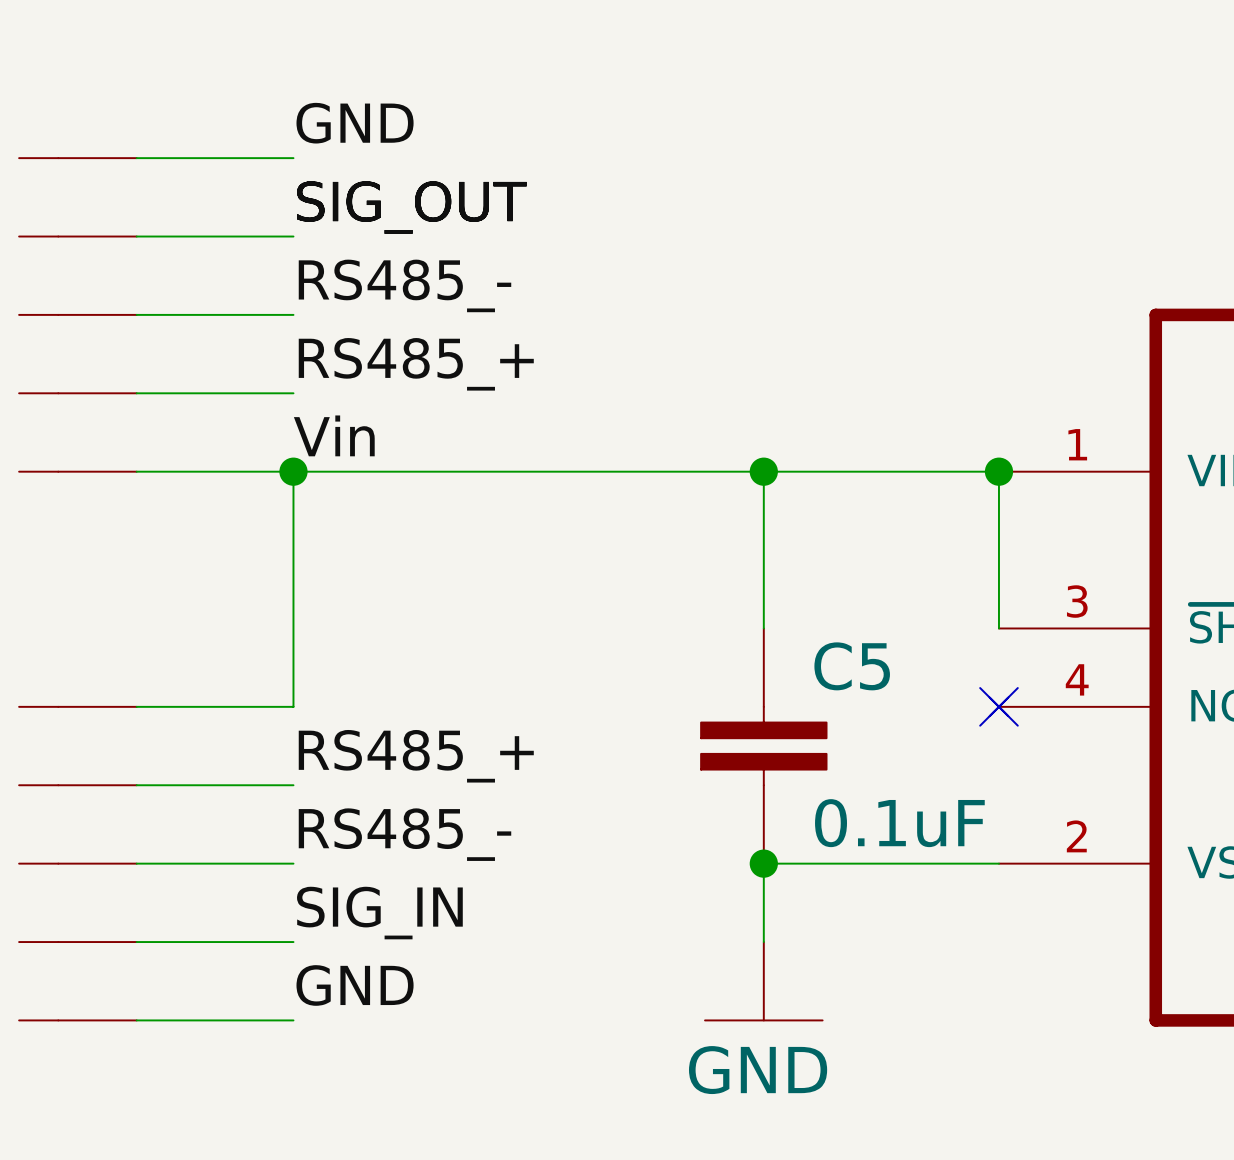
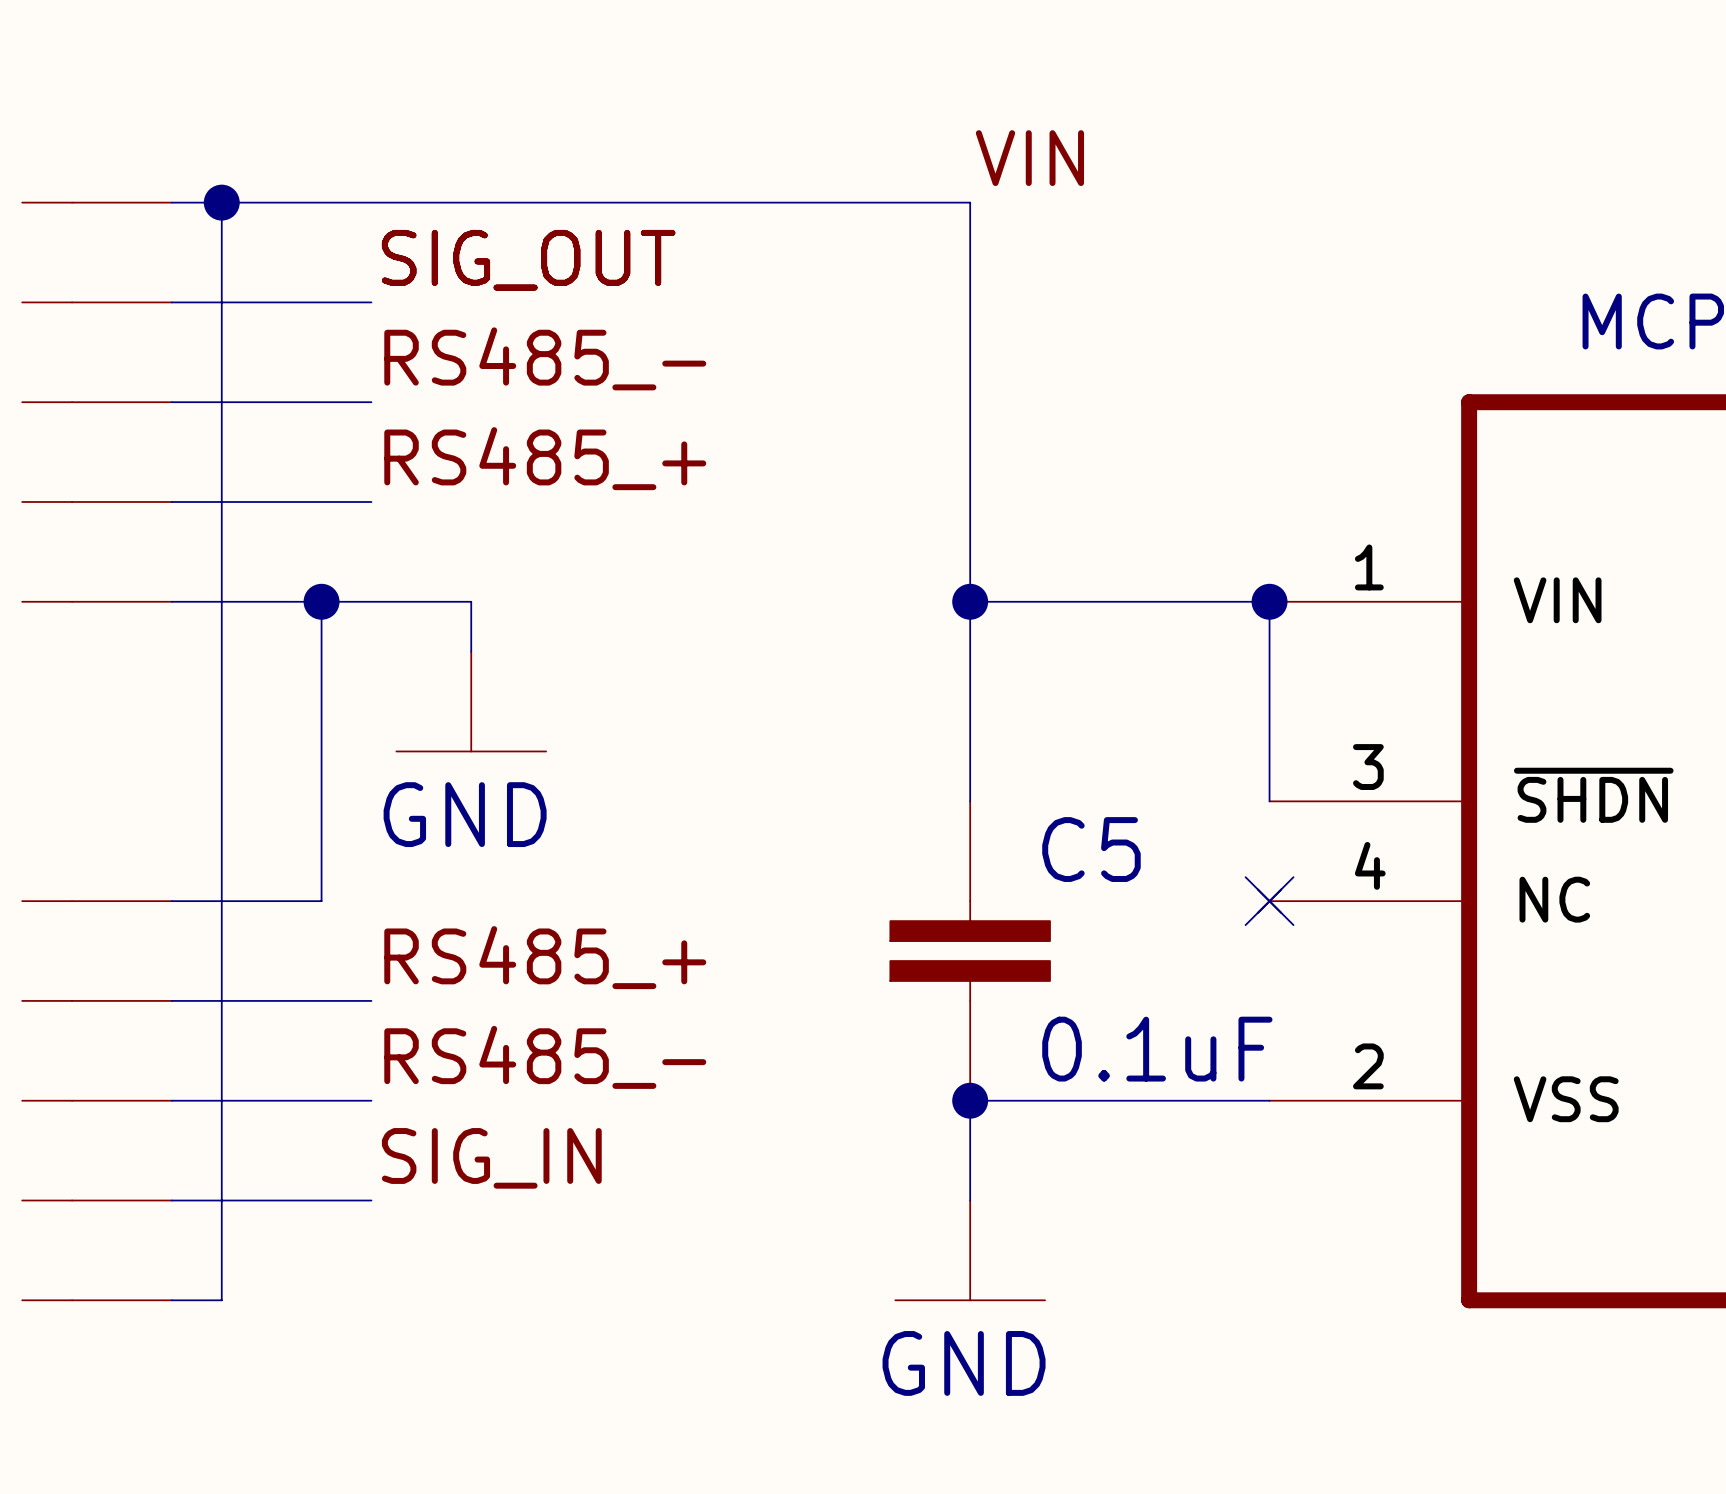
label: GND (355, 123) -> none
label: none -> VIN (1029, 158)
junction: none -> (221, 202)
label: Vin (334, 435) -> none
wire: (293, 471) (293, 706) (254, 706) -> (321, 601) (321, 901)
junction position: (293, 471) -> (321, 601)
wire: (371, 471) (763, 471) -> (371, 202) (970, 202) (970, 601)
wire: none -> (471, 601) (471, 651)
power symbol: none -> GND (471, 701)
label: GND (355, 985) -> none
wire: (175, 1020) (293, 1020) -> (221, 1300) (221, 202)

